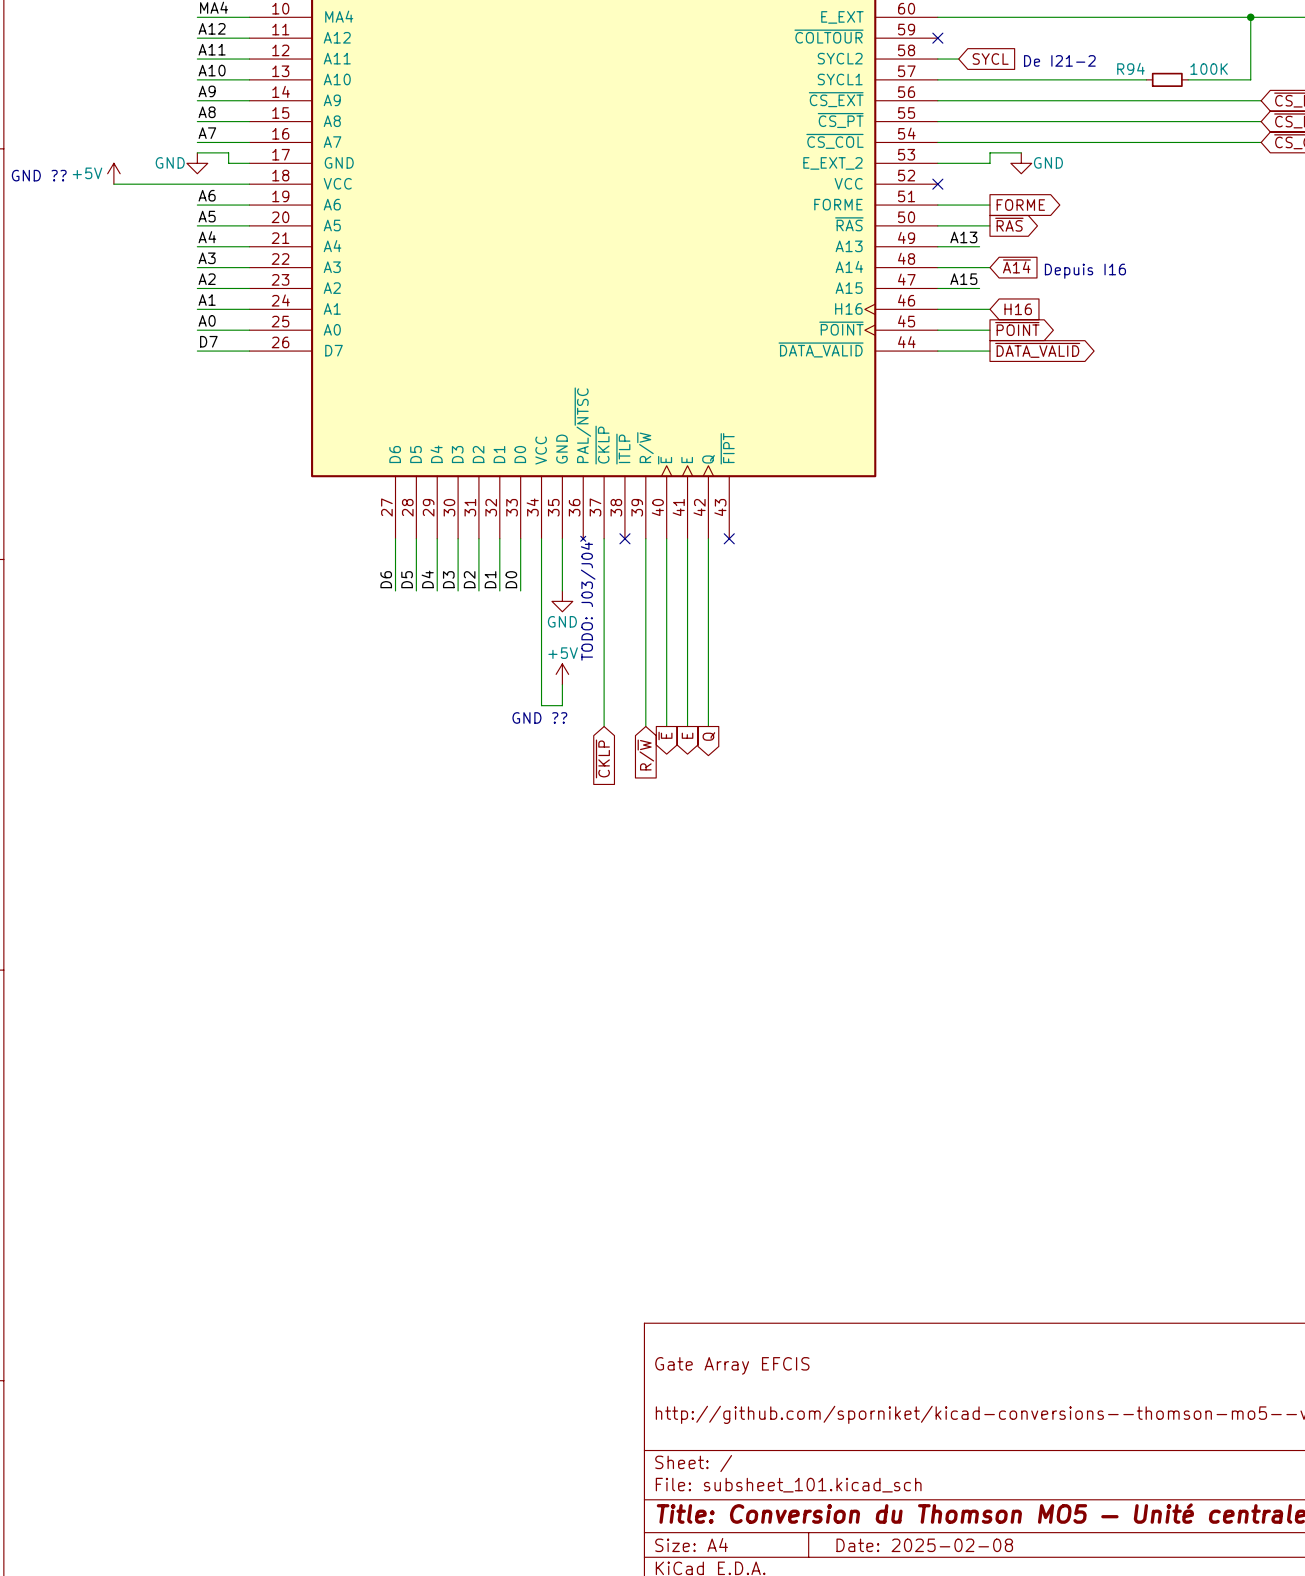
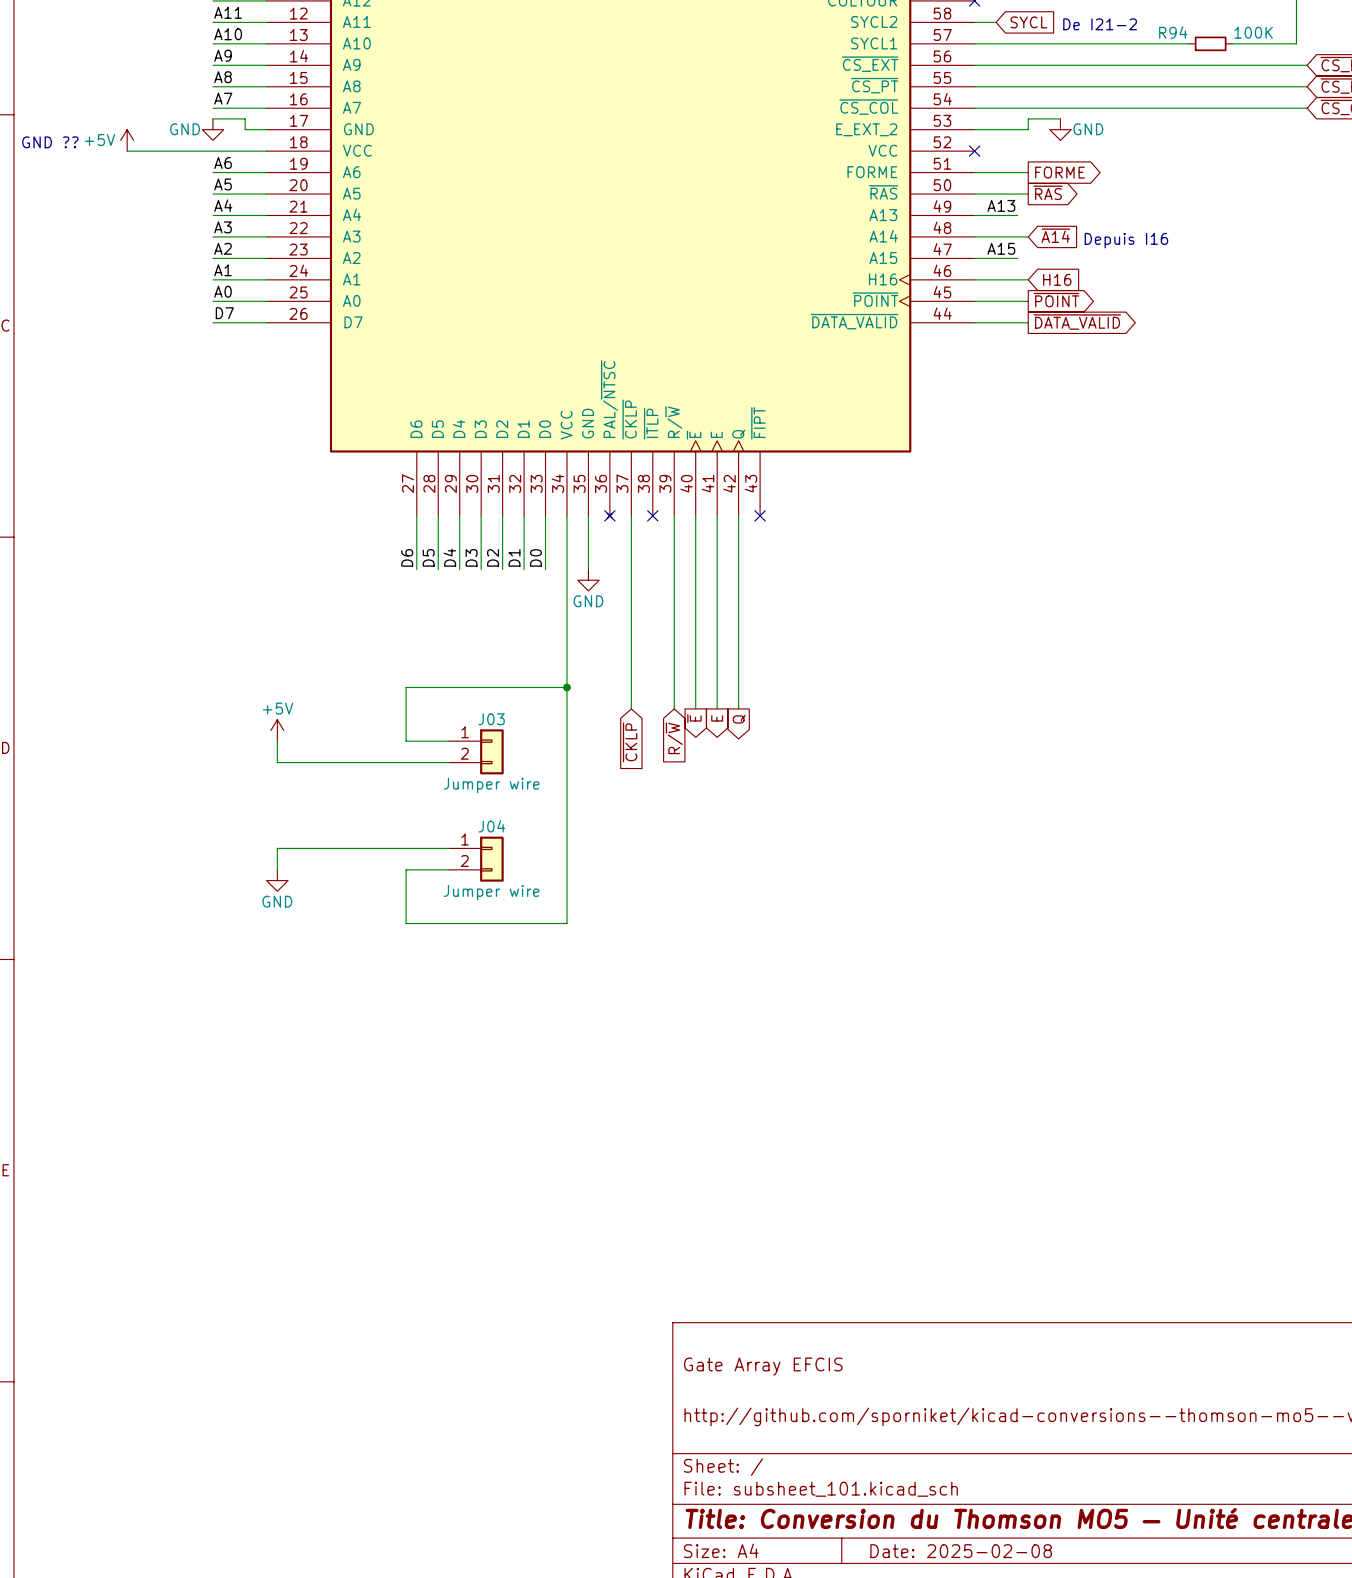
no-connect mark: none -> (609, 515)
text: TODO: J03/J04 (588, 601) -> none
power symbol: +5V (562, 674) -> none
wire: (562, 684) (562, 705) (541, 705) -> none
junction: none -> (566, 687)
text: GND ?? (539, 717) -> none
power symbol: none -> +5V (277, 730)
wire: none -> (277, 741) (277, 762) (448, 762)
wire: none -> (448, 741) (406, 741) (406, 687) (566, 687) (566, 923) (406, 923) (406, 869) (448, 869)
J03: none -> Jumper wire (476, 751)
wire: none -> (448, 848) (277, 848) (277, 869)
J04: none -> Jumper wire (476, 859)
power symbol: none -> GND (277, 880)

